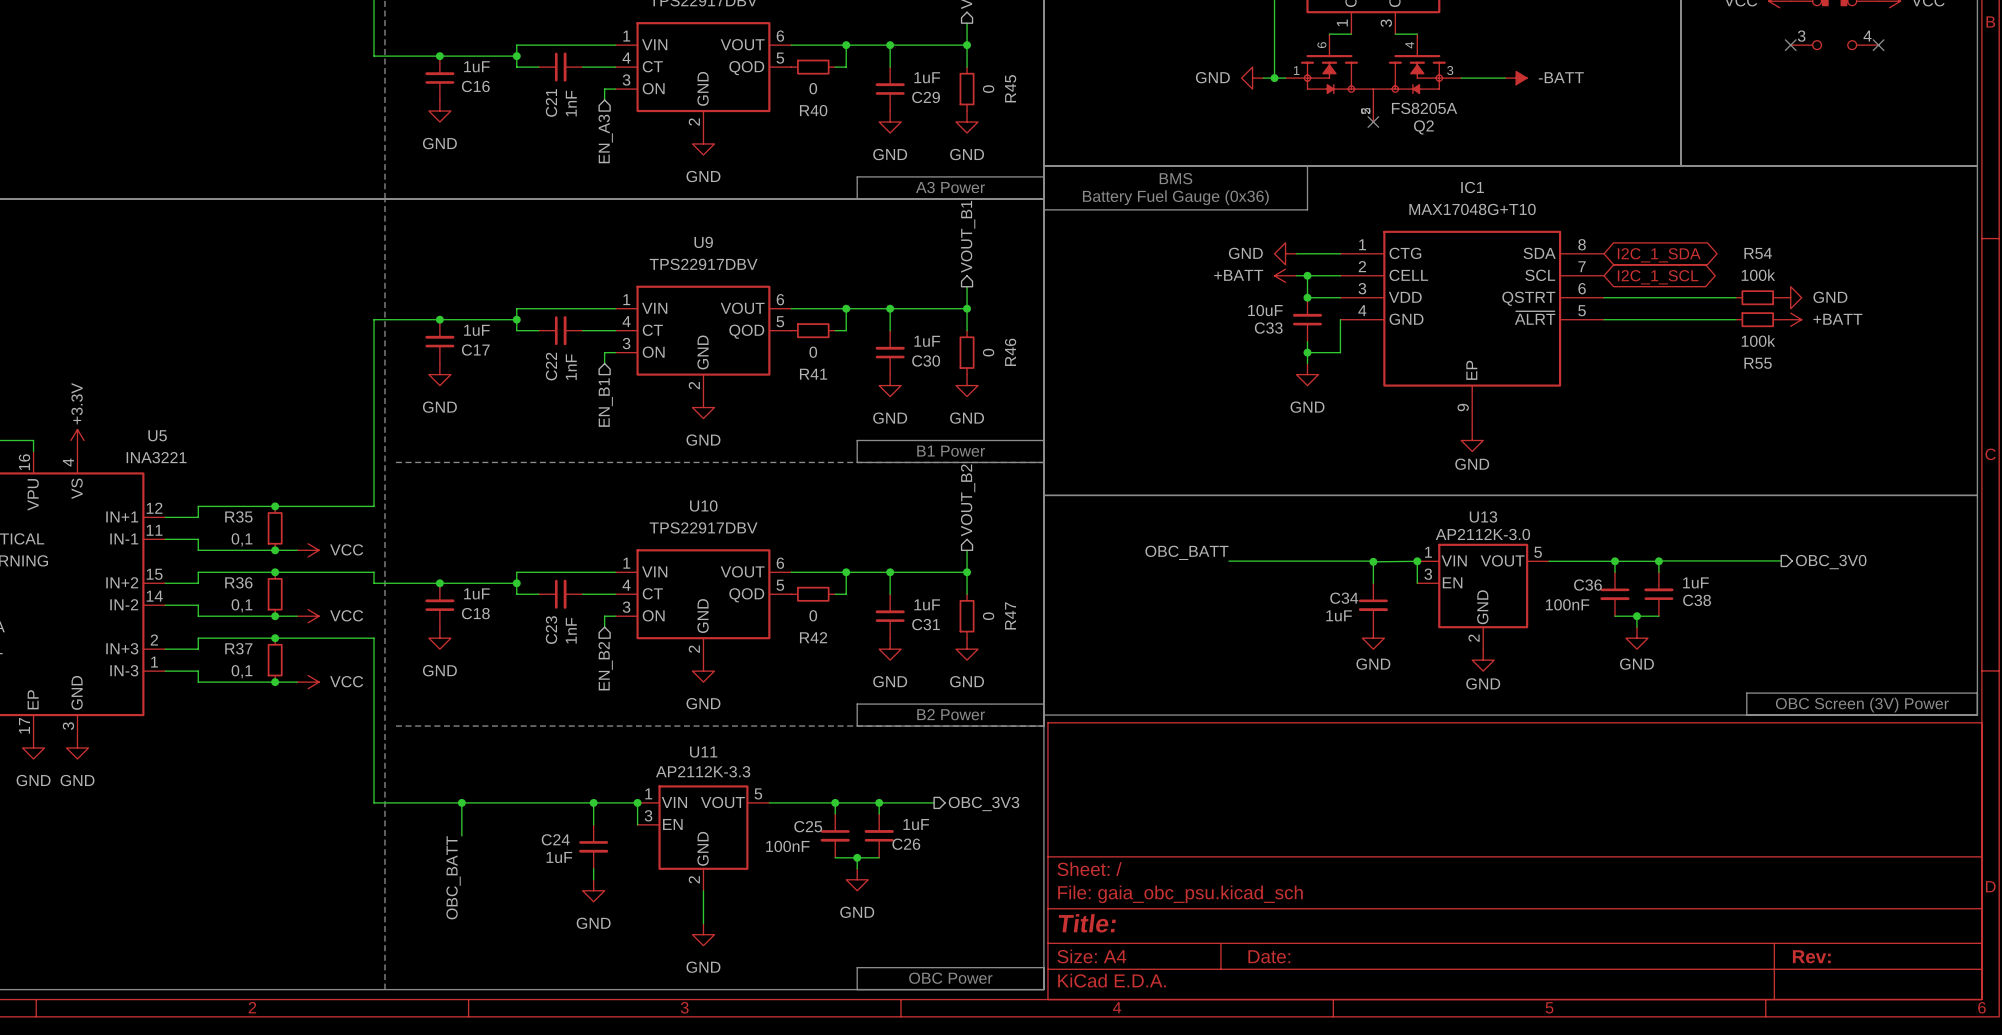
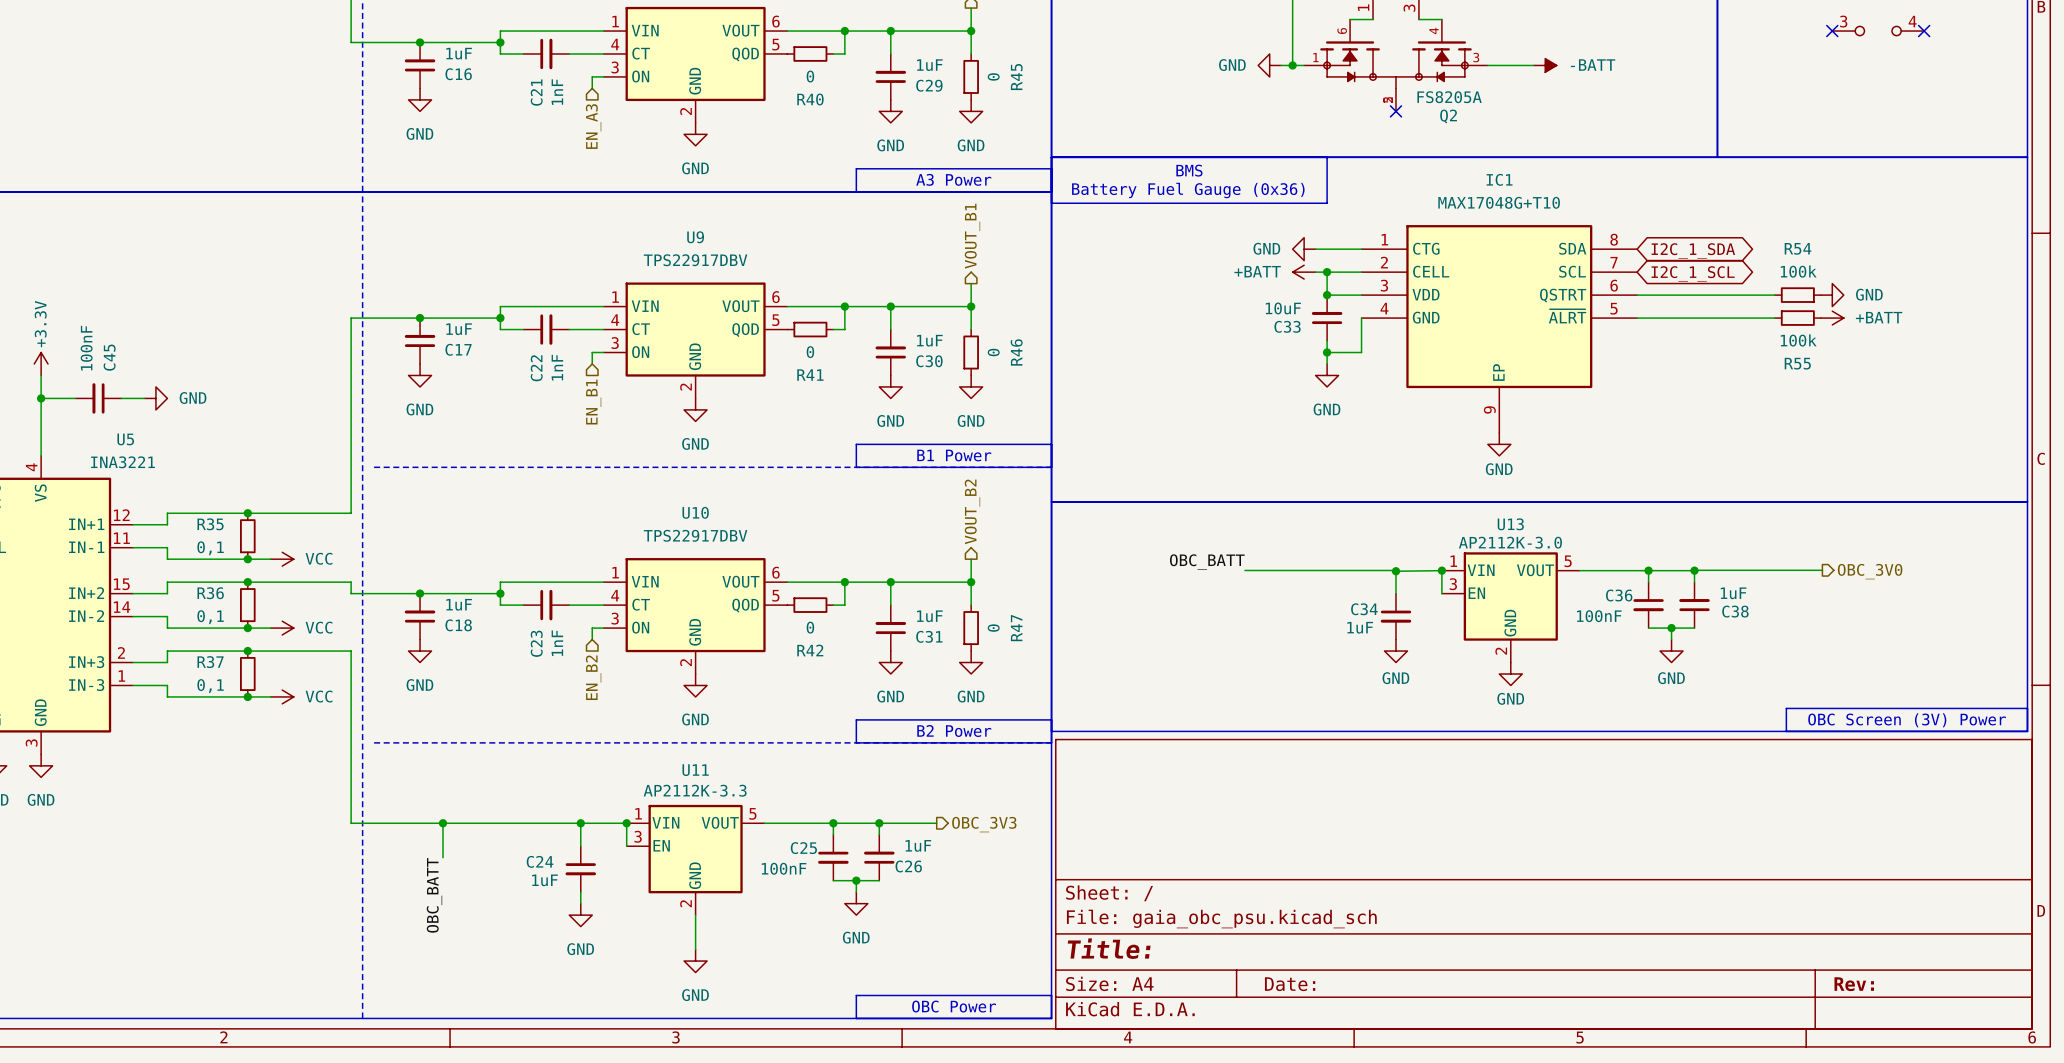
wire: none -> (41, 375) (41, 455)
wire: none -> (41, 398) (75, 398)
junction: none -> (41, 398)
C45: none -> 100nF (98, 398)
wire: none -> (121, 398) (144, 398)
power symbol: none -> GND (155, 398)
power symbol position: +3.3V (77, 440) -> +3.3V (41, 363)

